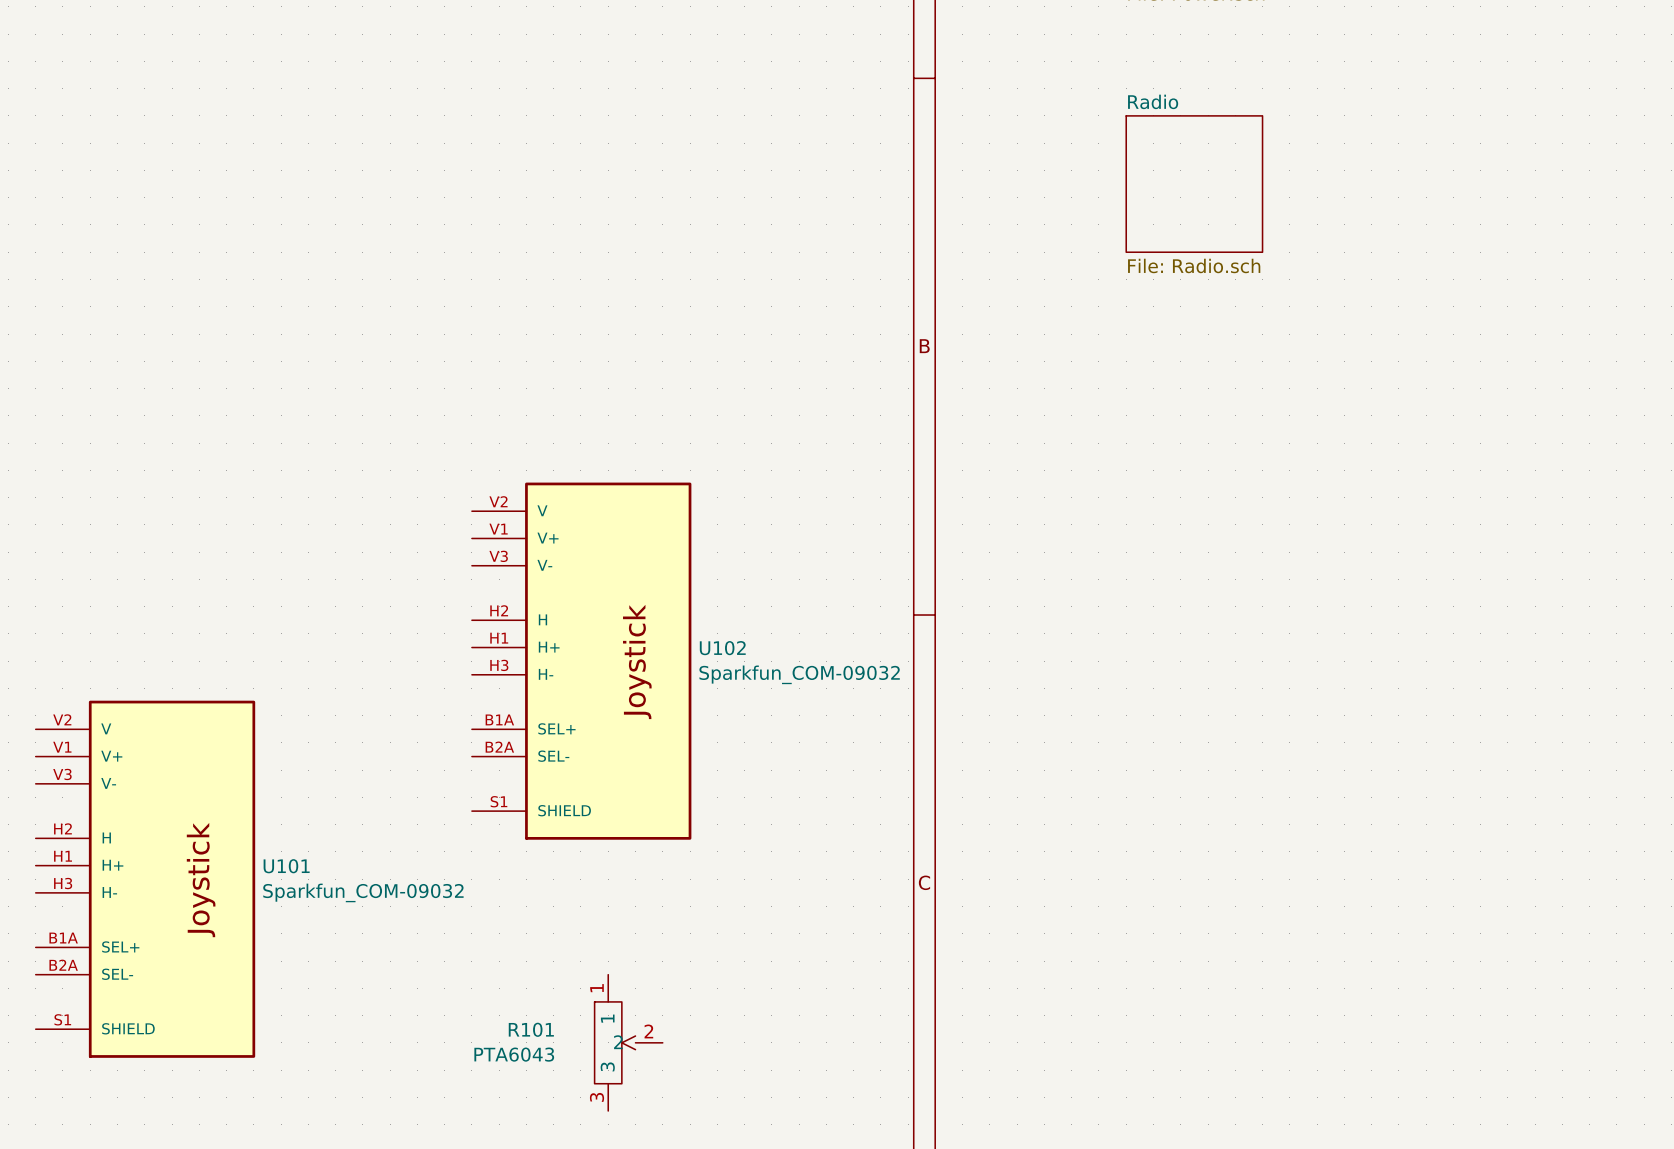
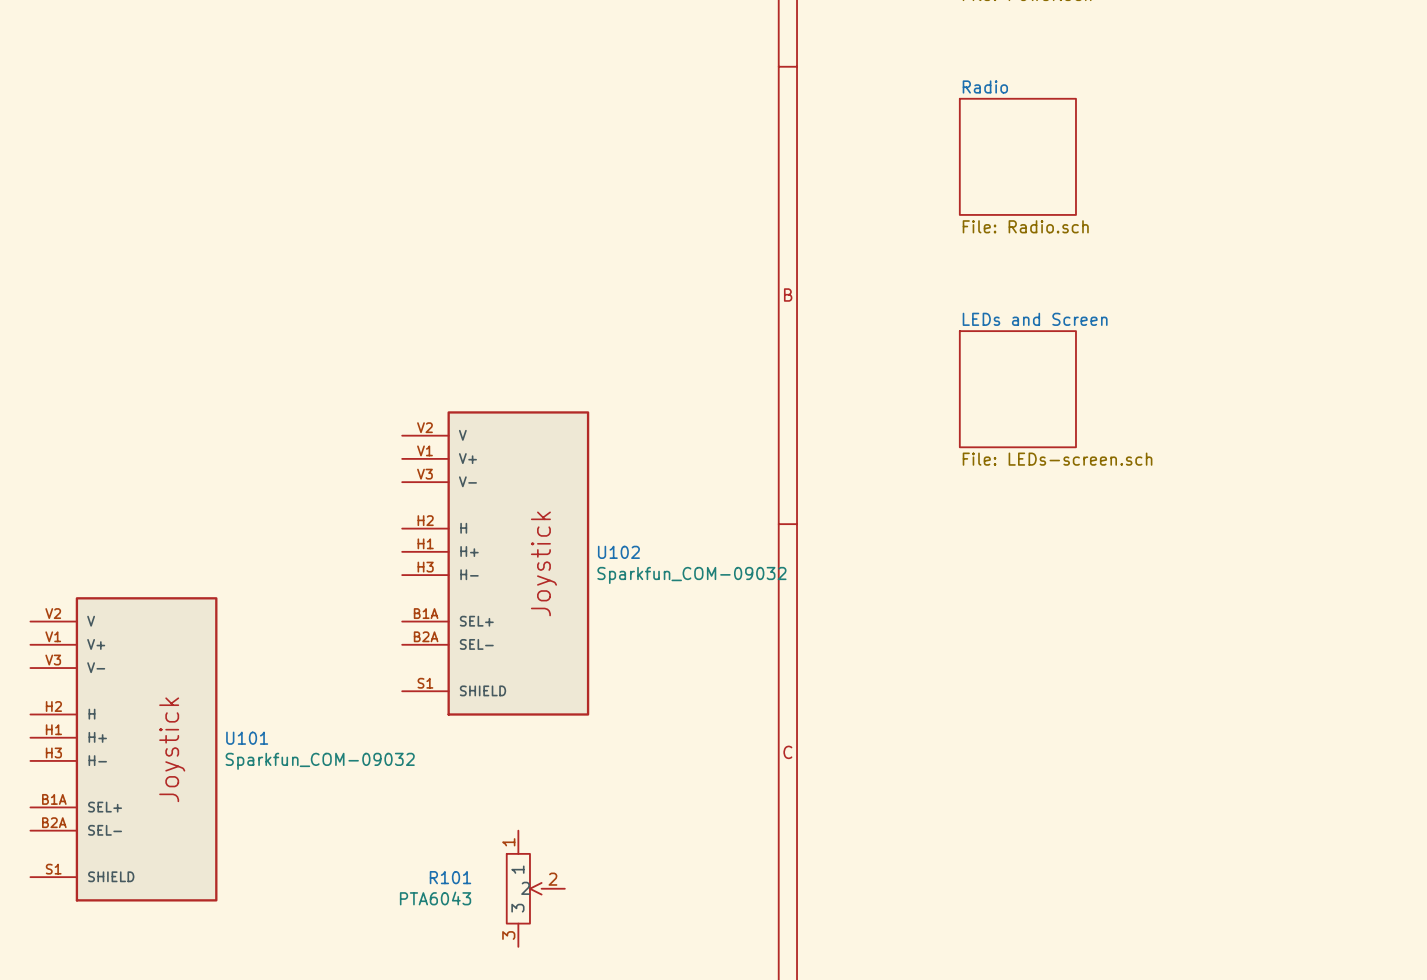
sheet LEDs and Screen: none -> File: LEDs-screen.sch (1017, 389)

